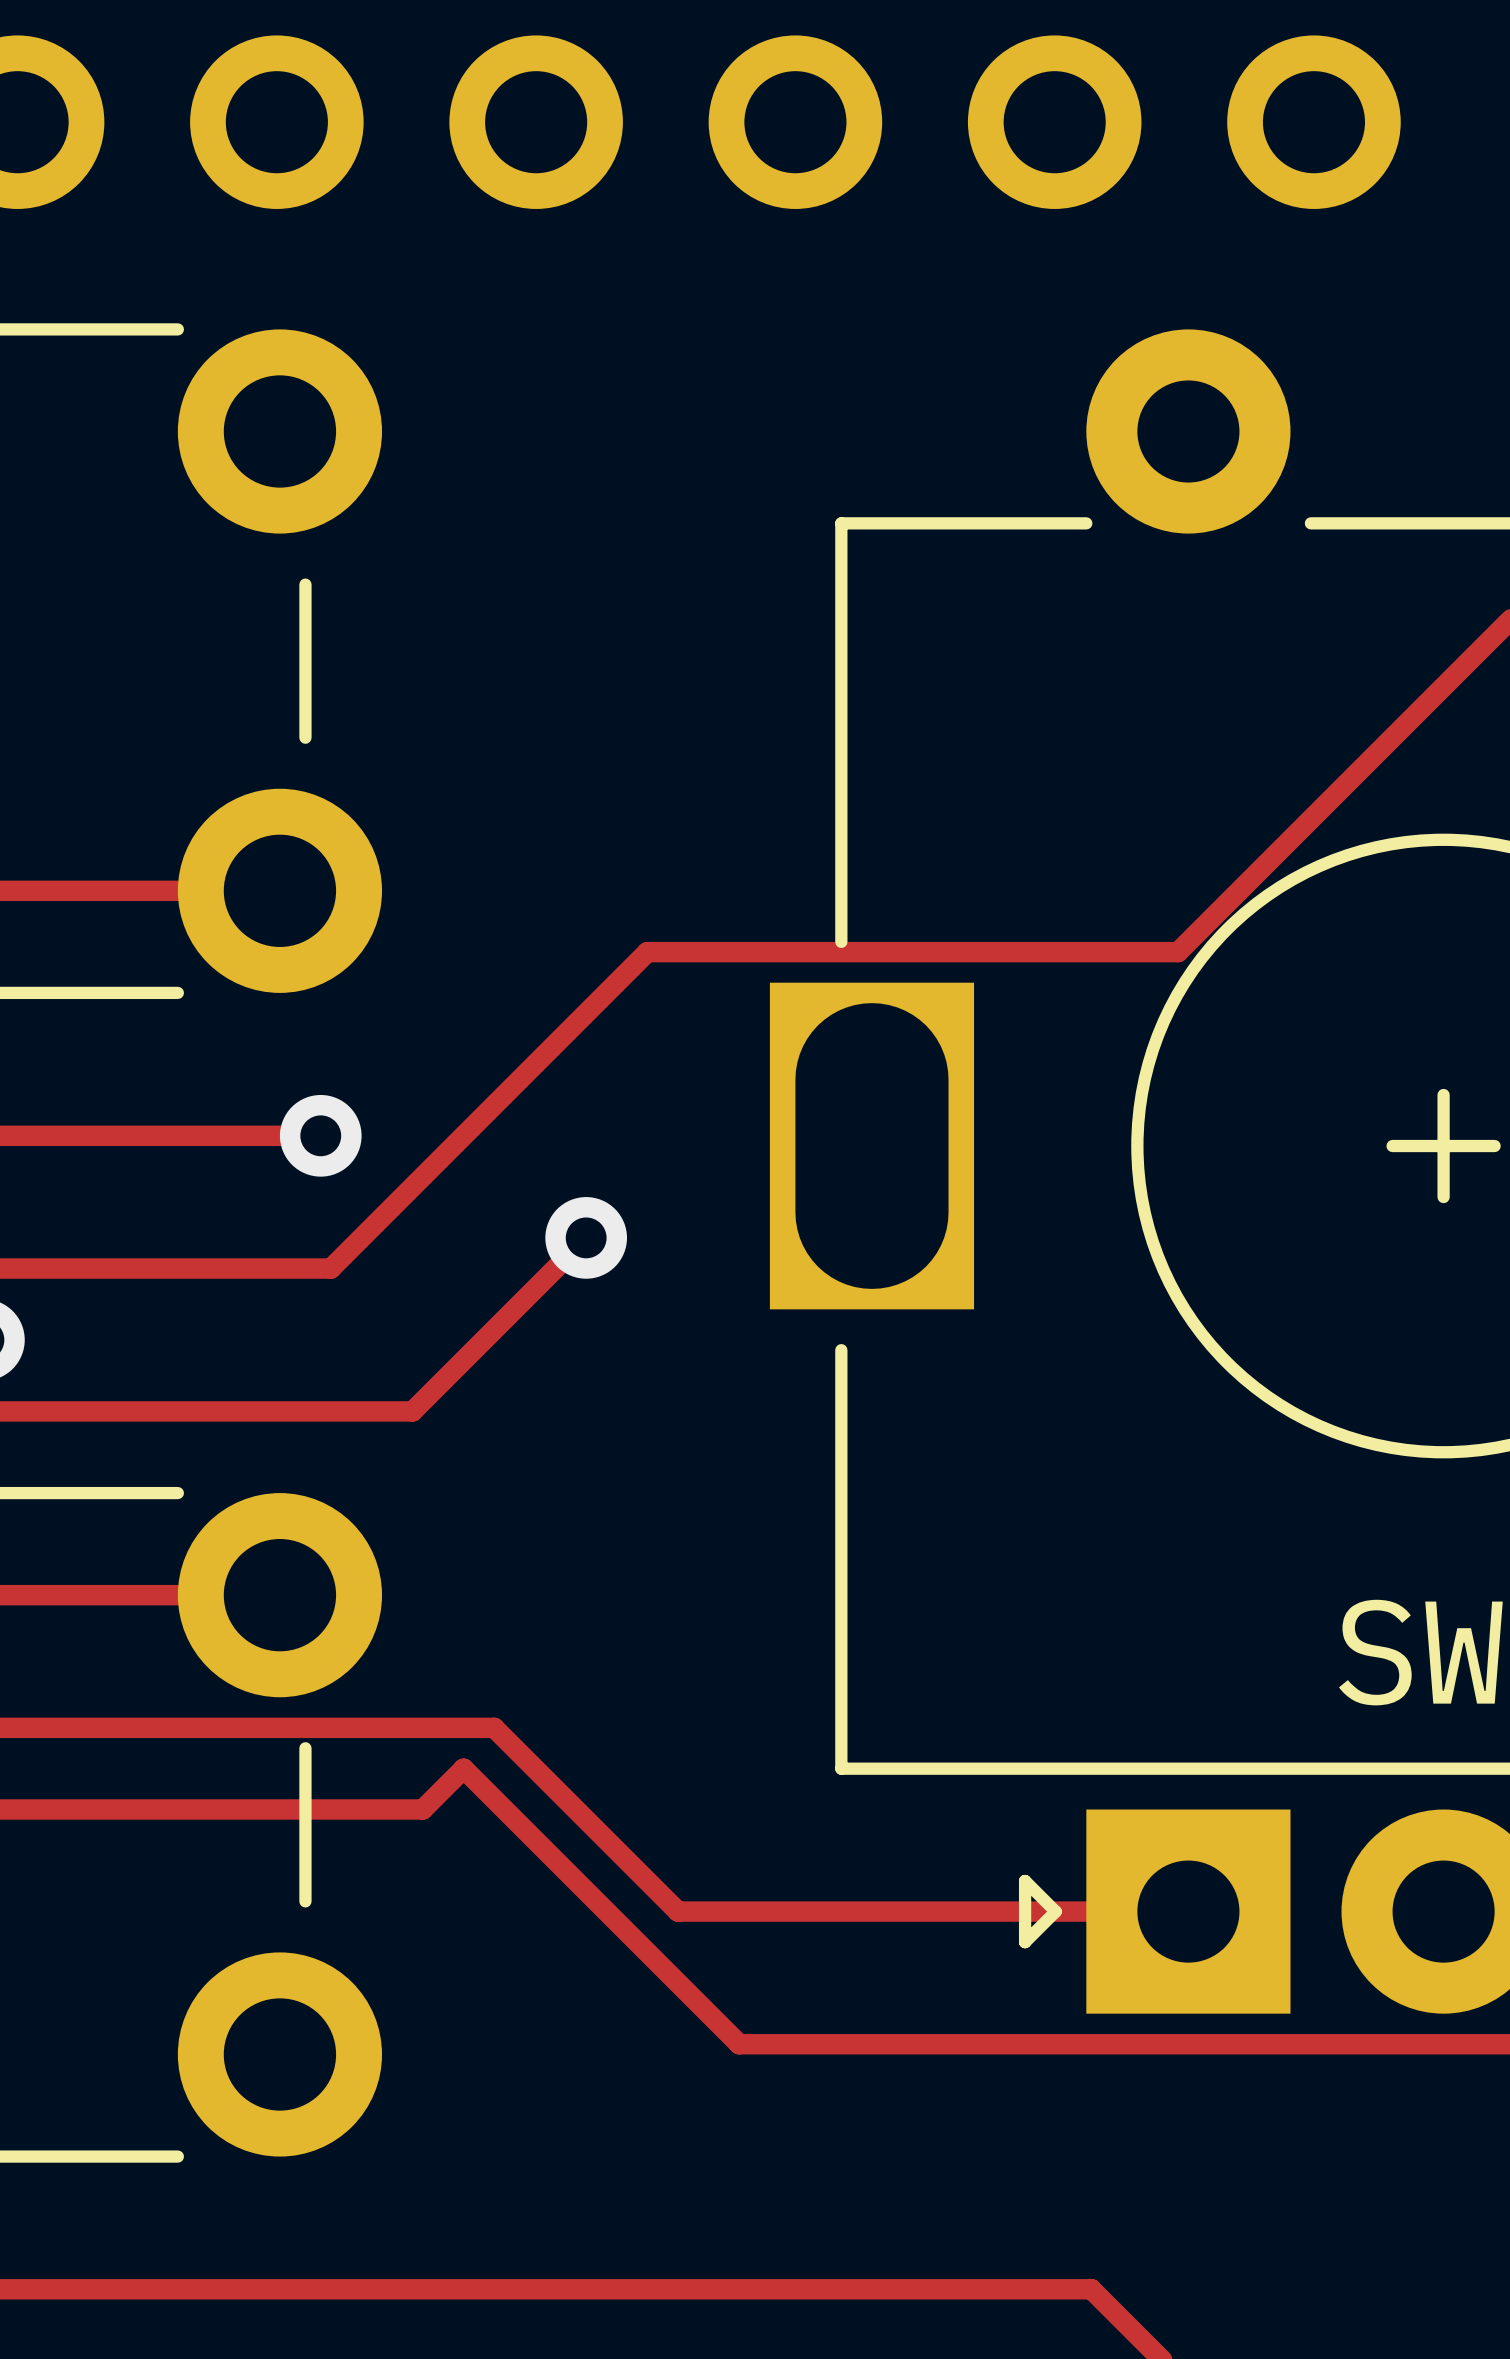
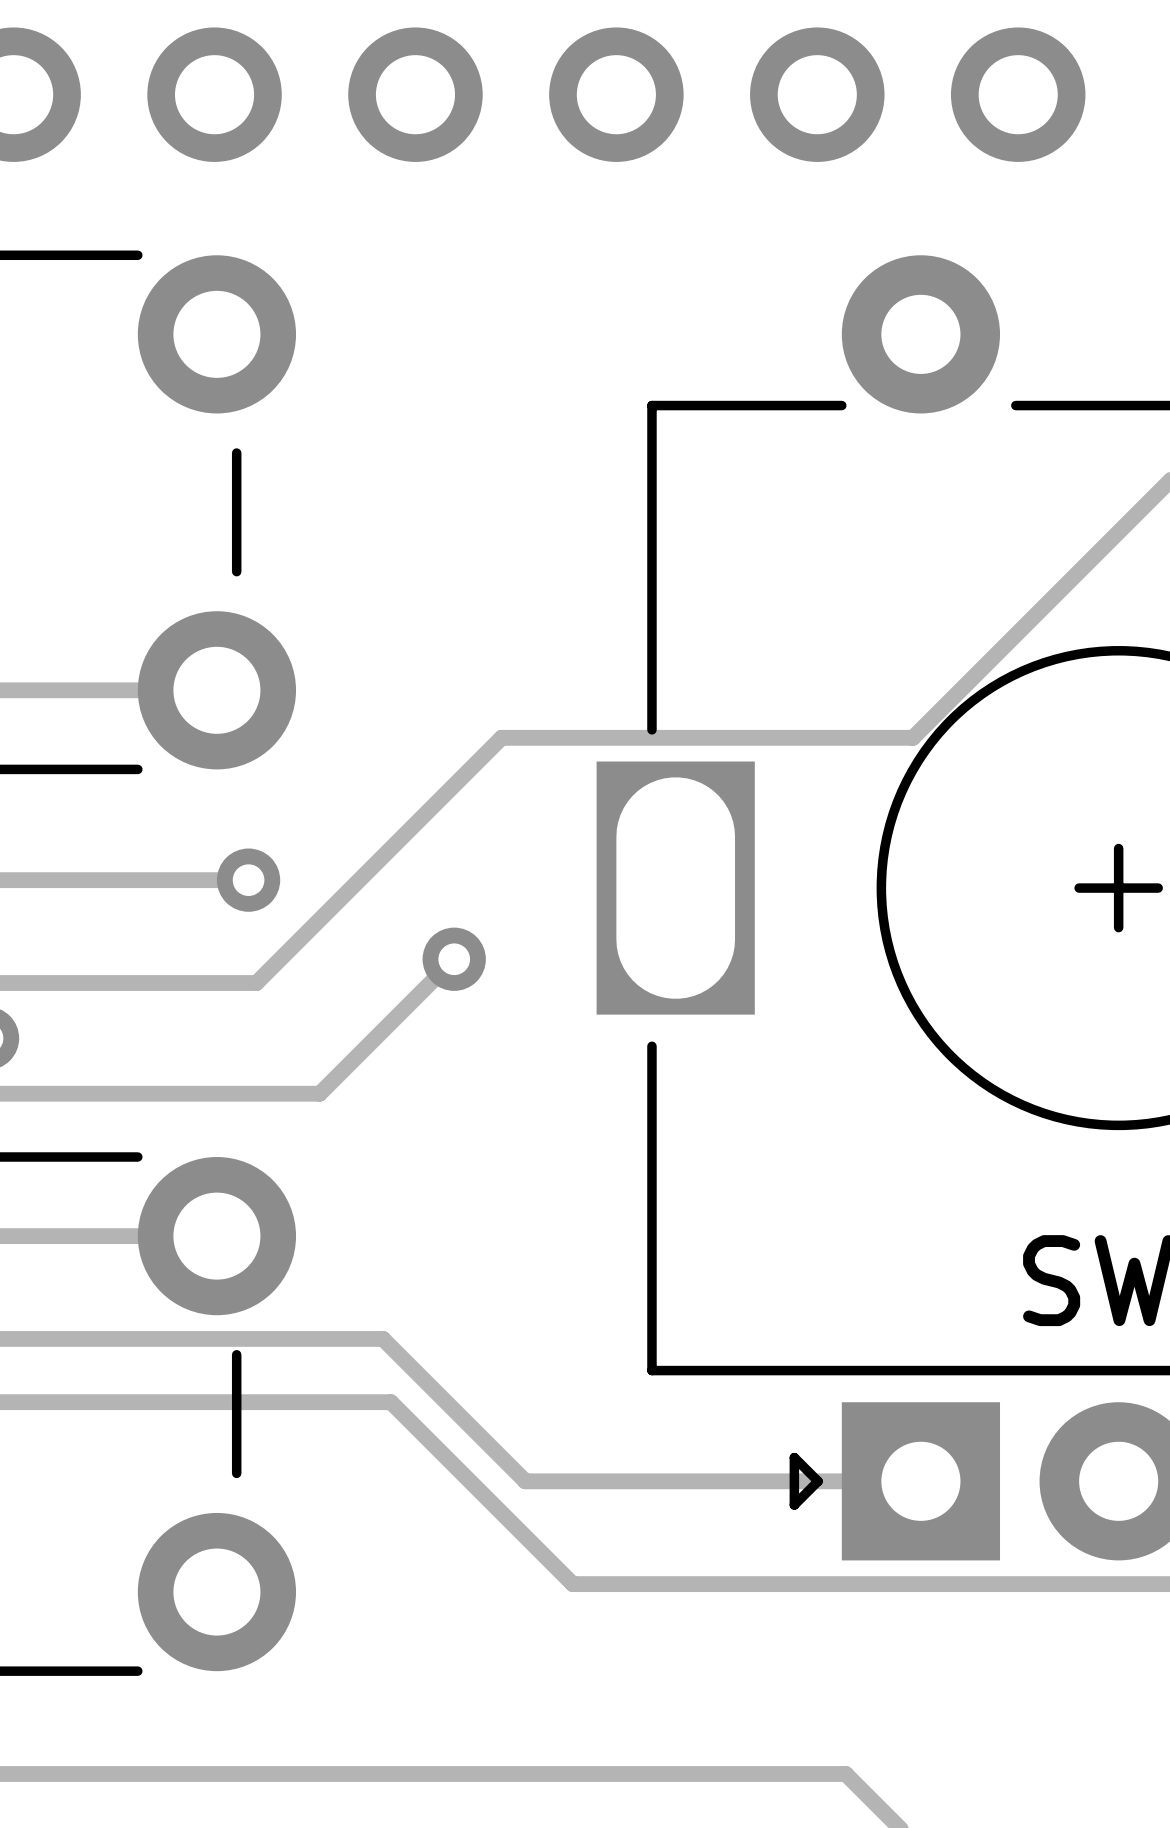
track: (422, 1809) (463, 1768) (504, 1809) -> (327, 1402) (390, 1402)

